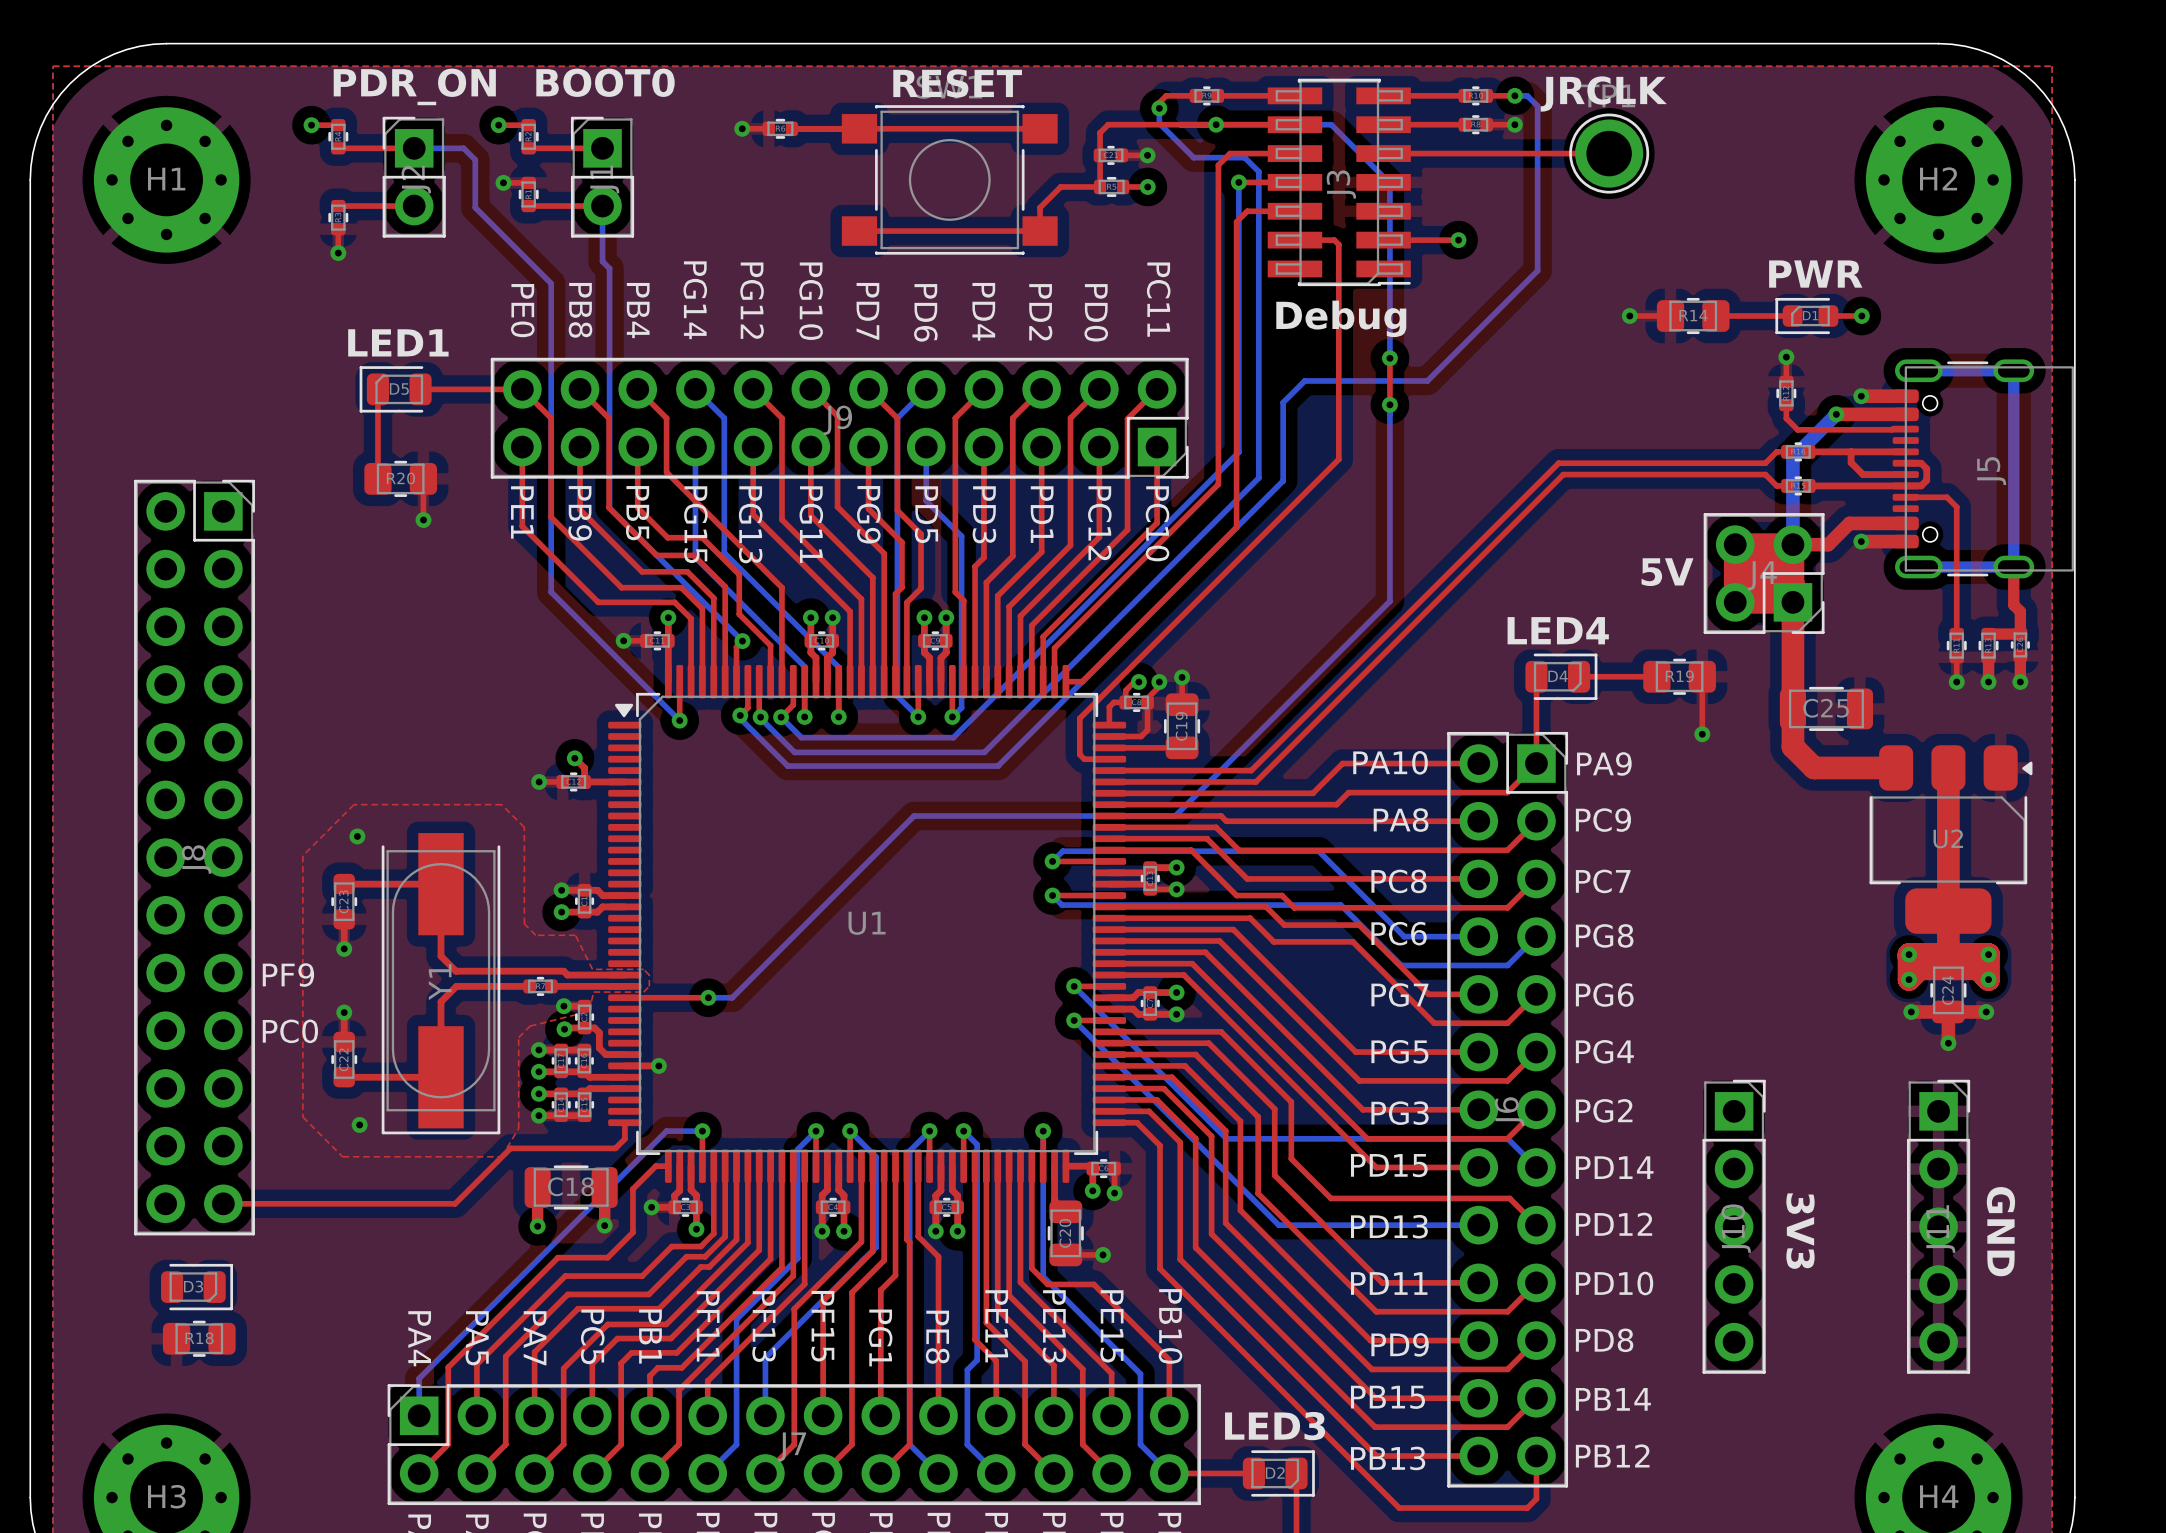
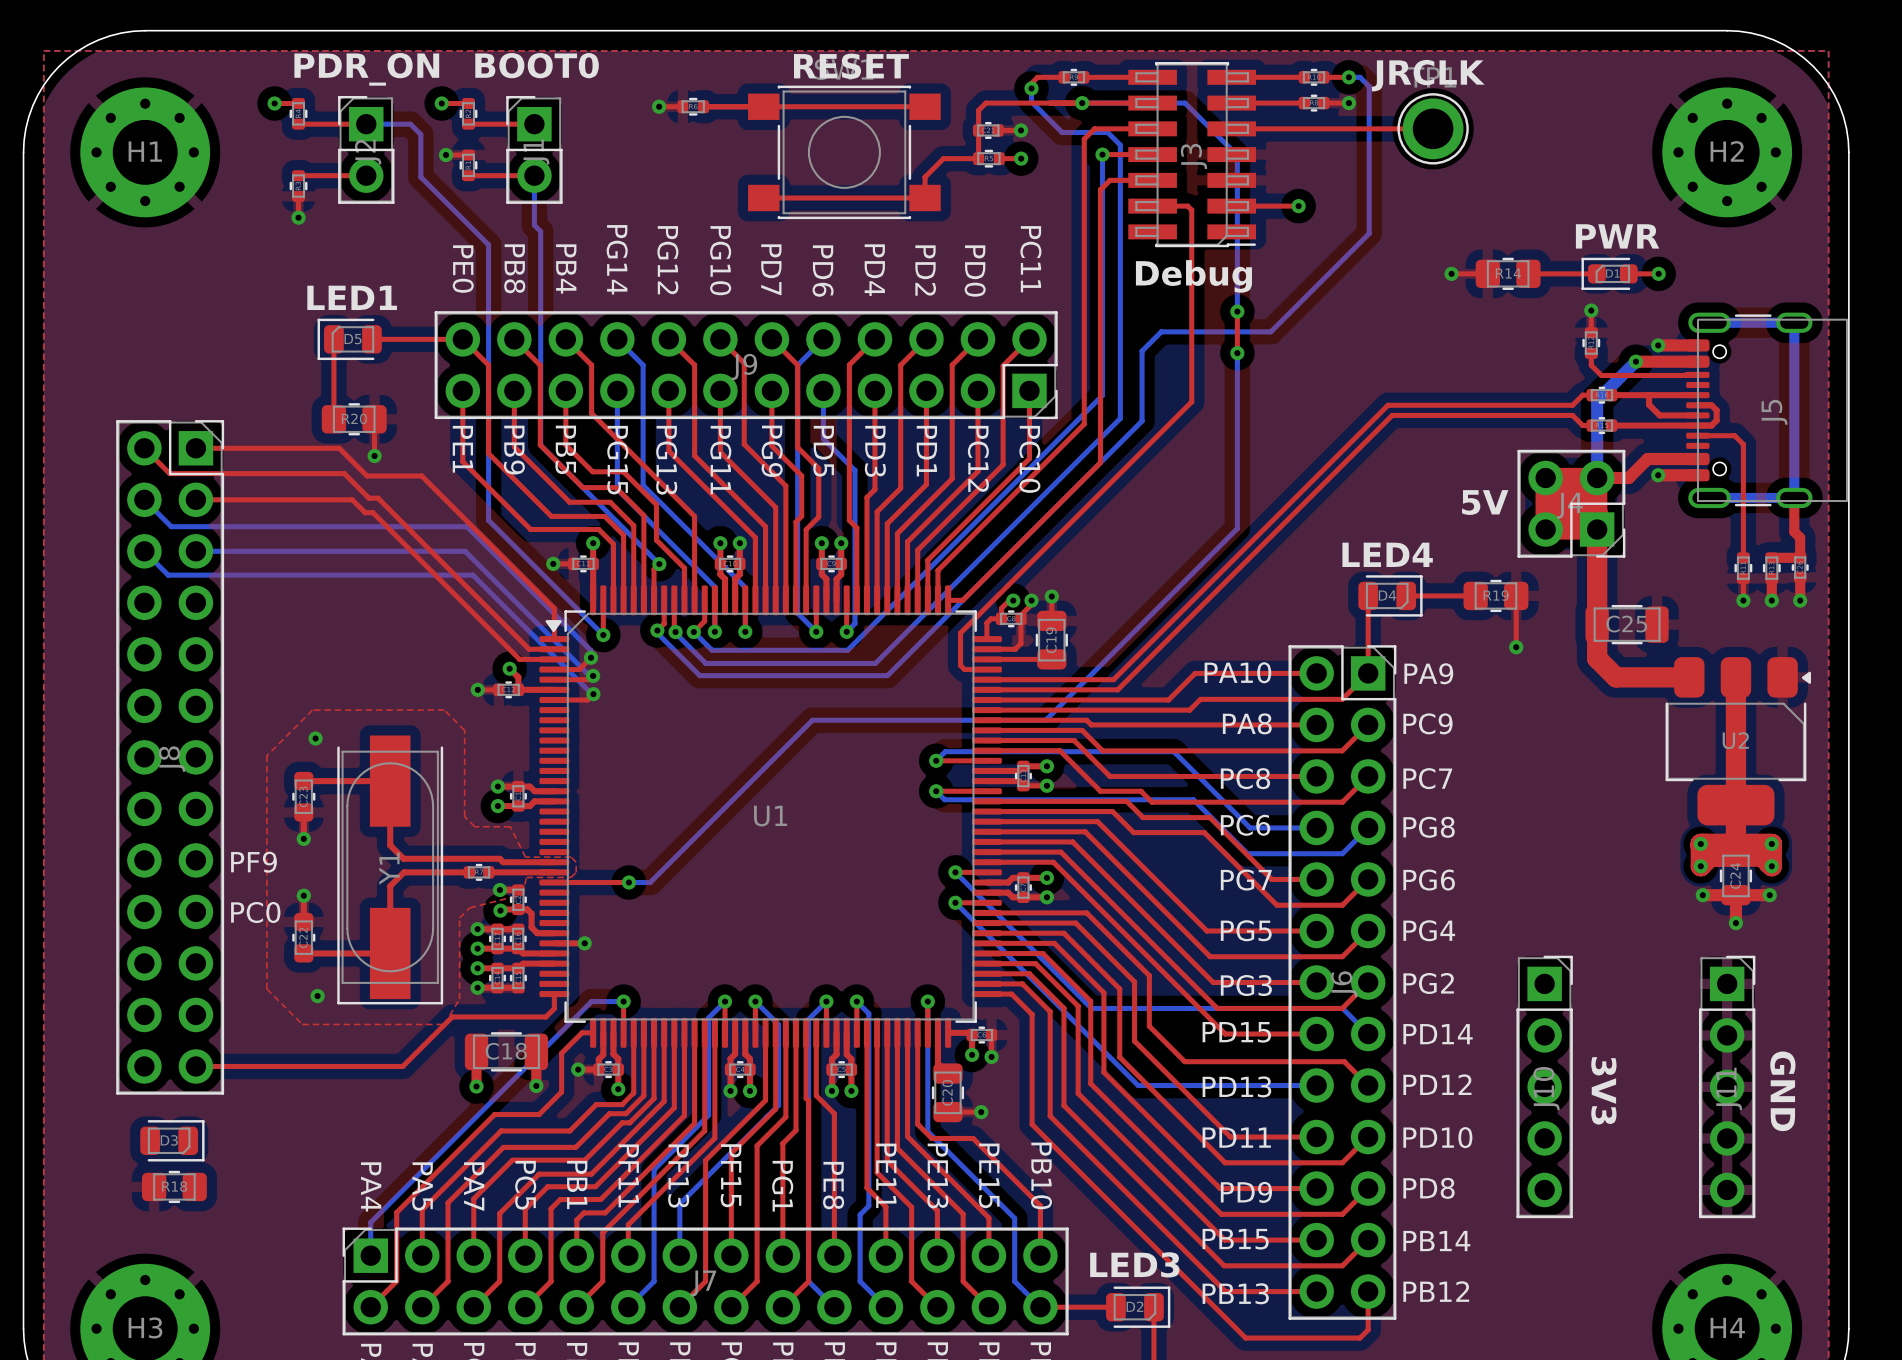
top track: none -> (144, 448) (169, 473) (344, 473) (368, 498) (378, 498) (529, 649) (554, 649)
top track: none -> (195, 448) (339, 448) (366, 475) (421, 475) (554, 608) (554, 639)
bottom track: none -> (144, 499) (171, 526) (466, 526) (591, 650) (591, 657)
top track: none -> (195, 499) (352, 499) (365, 512) (372, 512) (519, 659) (554, 659)
bottom track: none -> (144, 551) (168, 575) (472, 575) (593, 694)
bottom track: none -> (195, 551) (465, 551) (589, 675) (593, 675)
top track: none -> (591, 657) (579, 669) (554, 669)
via: none -> (591, 657)
top track: none -> (593, 675) (589, 679) (554, 679)
via: none -> (593, 675)
top track: none -> (593, 694) (587, 699) (554, 699)
via: none -> (593, 694)

